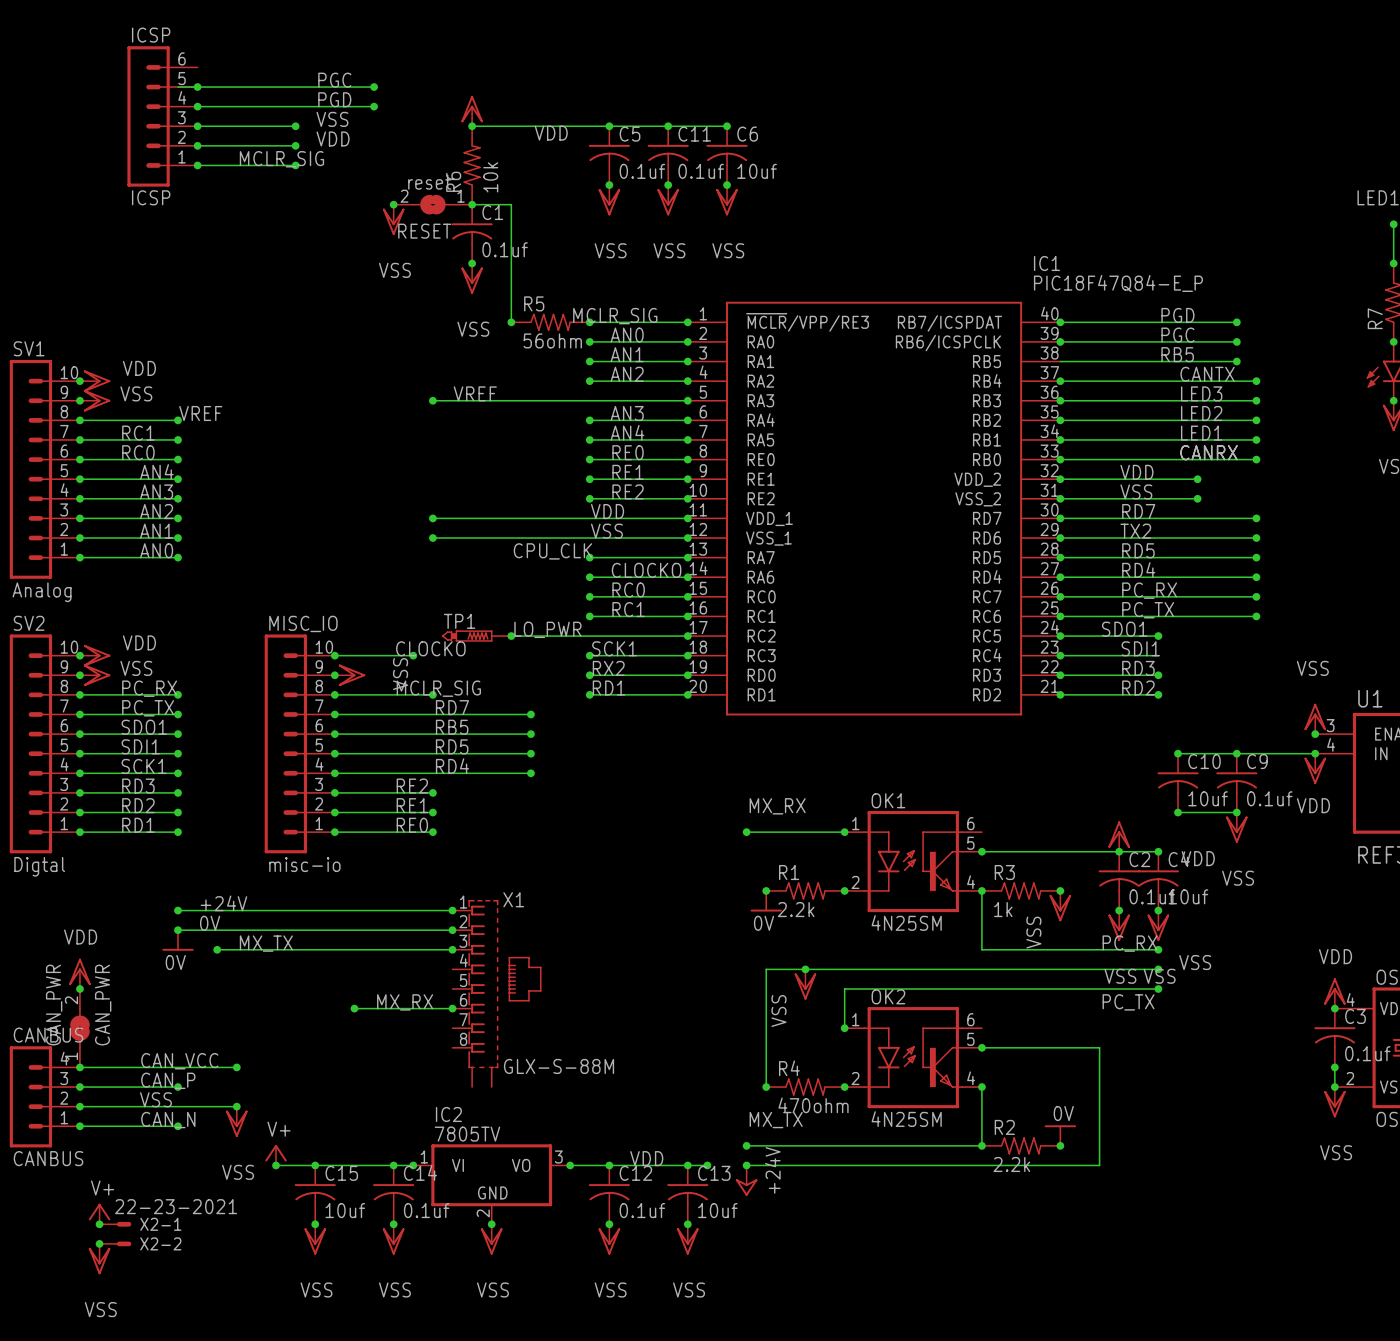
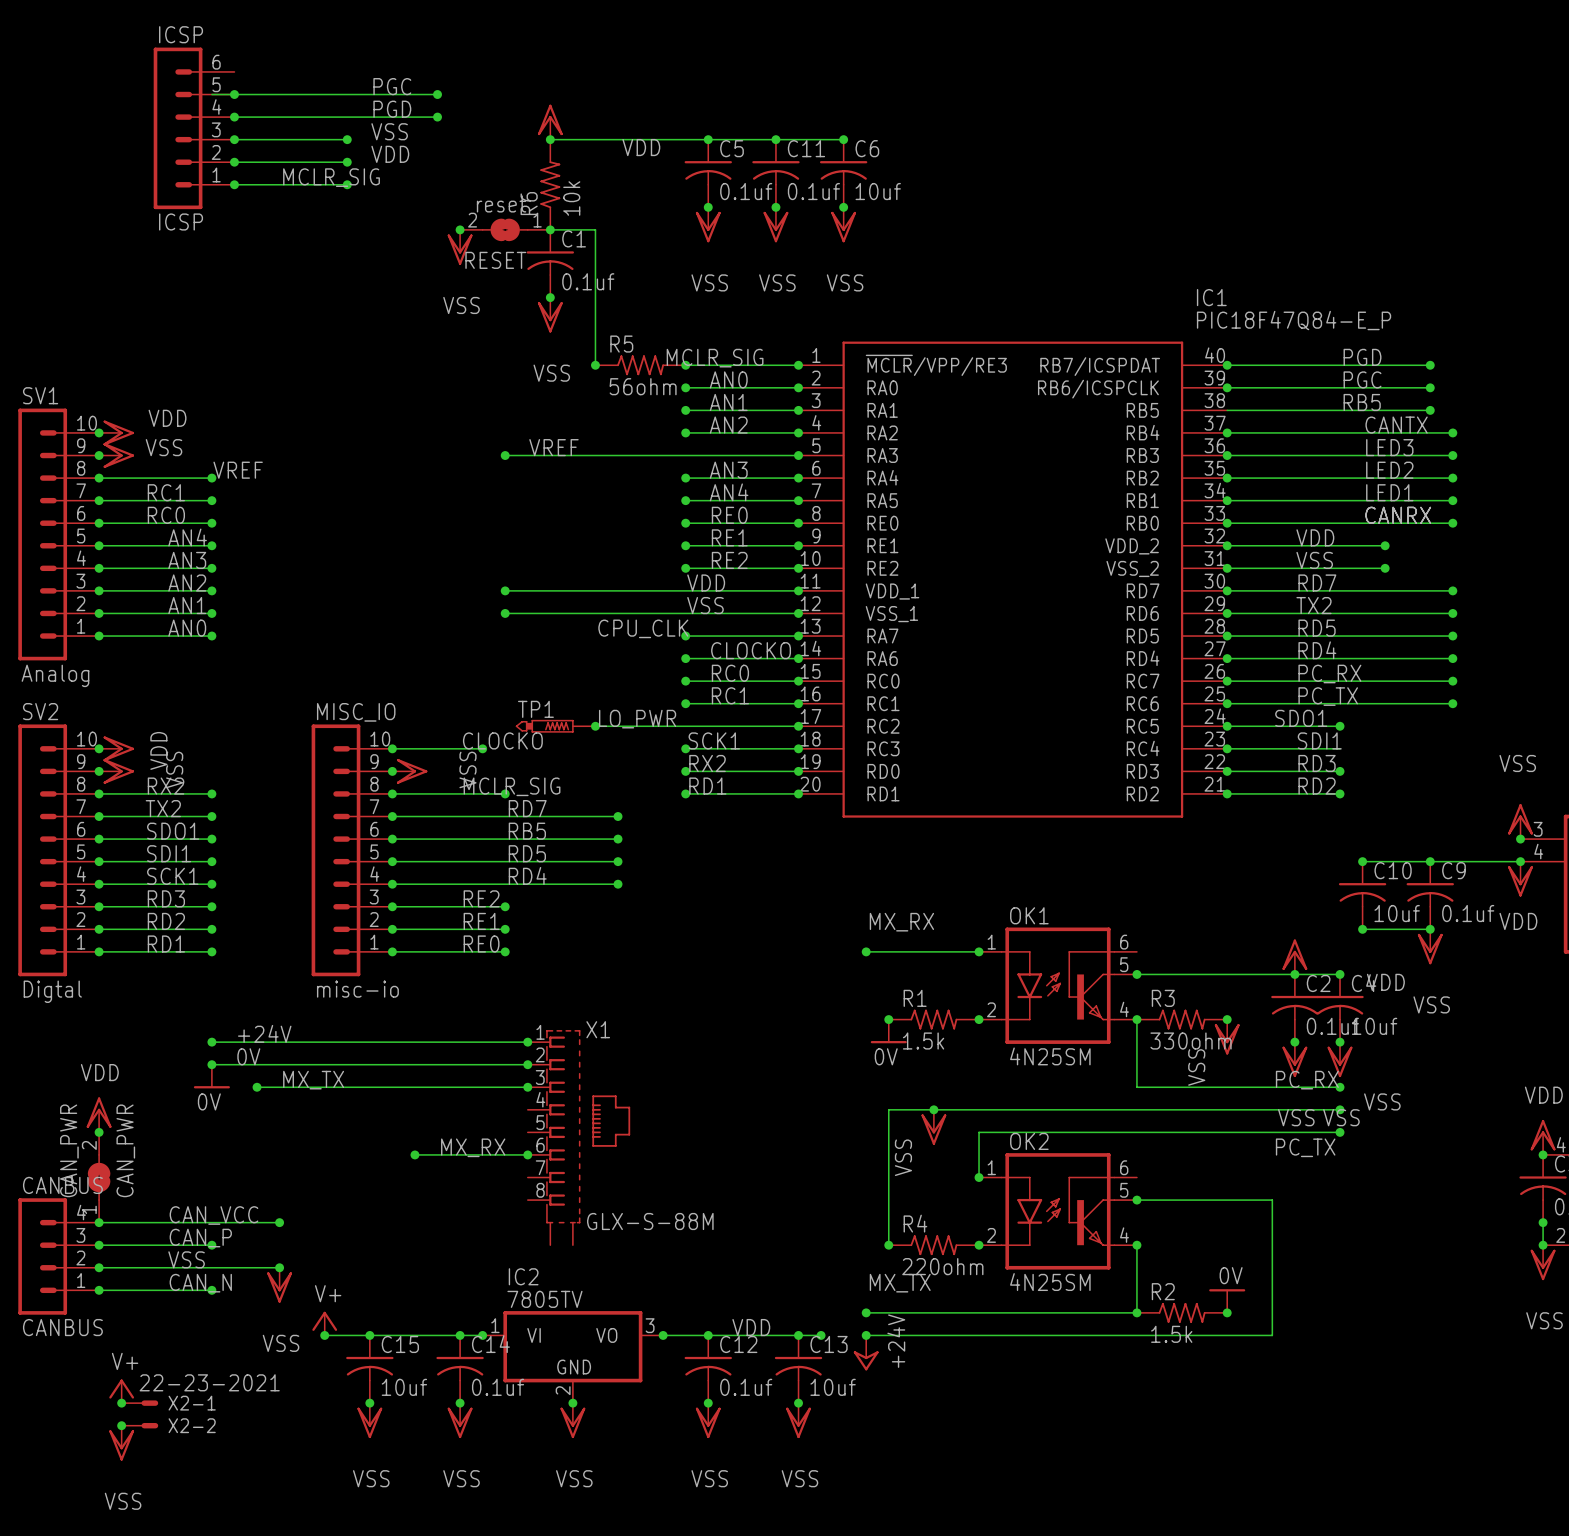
power symbol text rotation: 0° (139, 642) -> 90° counterclockwise (158, 750)
power symbol text rotation: 0° (136, 668) -> 90° counterclockwise (174, 769)
label: PC_RX (149, 688) -> RX2 (166, 786)
label: PC_TX (148, 708) -> TX2 (163, 808)
R1 value: 2.2k (796, 909) -> 1.5k (923, 1041)
R3 value: 1k (1003, 909) -> 330ohm (1191, 1041)
R4 value: 470ohm (813, 1105) -> 220ohm (942, 1266)
R2 value: 2.2k (1011, 1164) -> 1.5k (1171, 1334)

